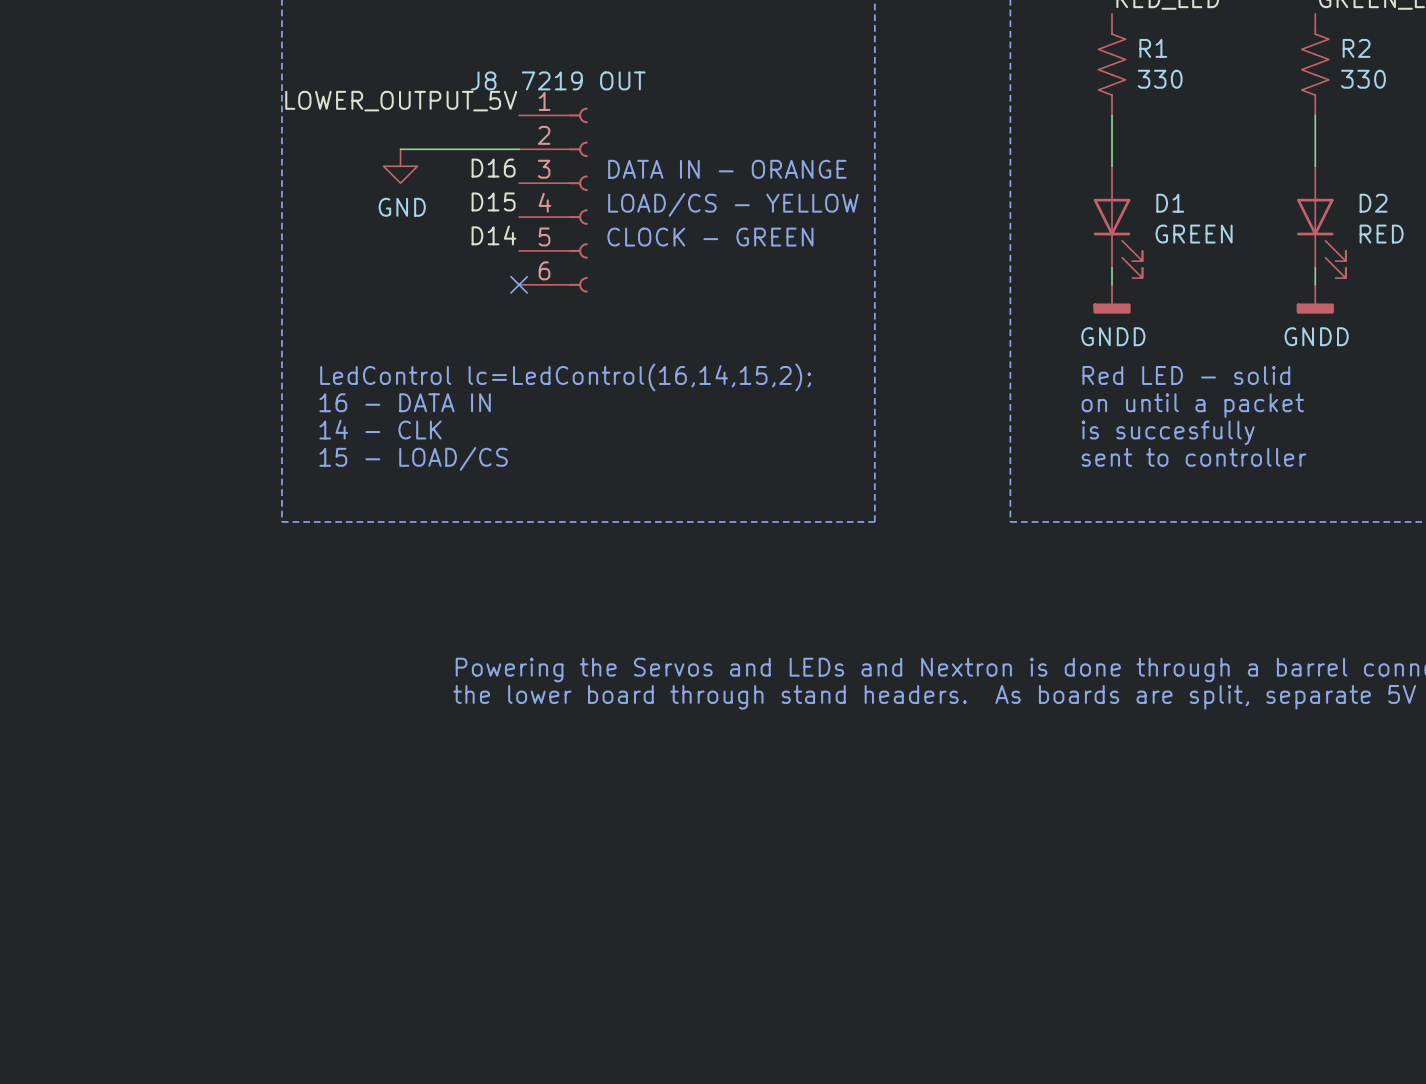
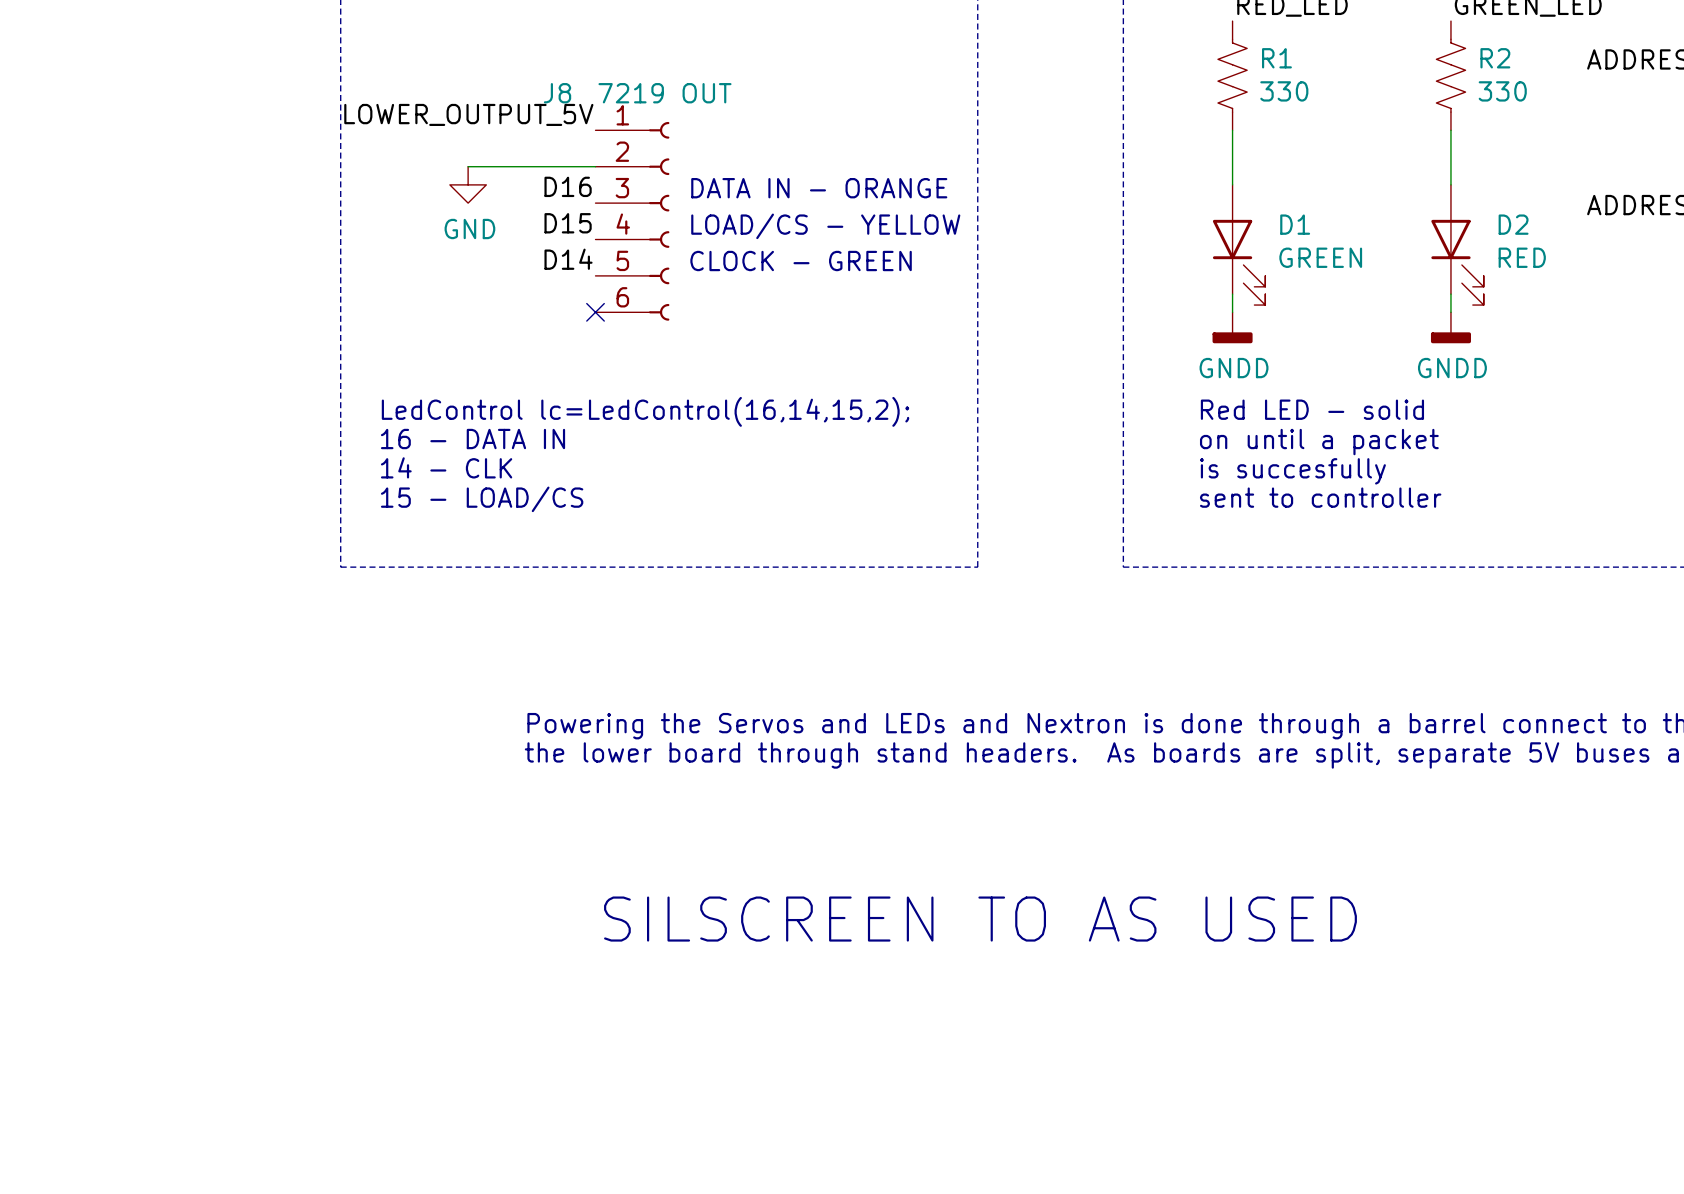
text: none -> SILSCREEN TO AS USED (980, 919)

